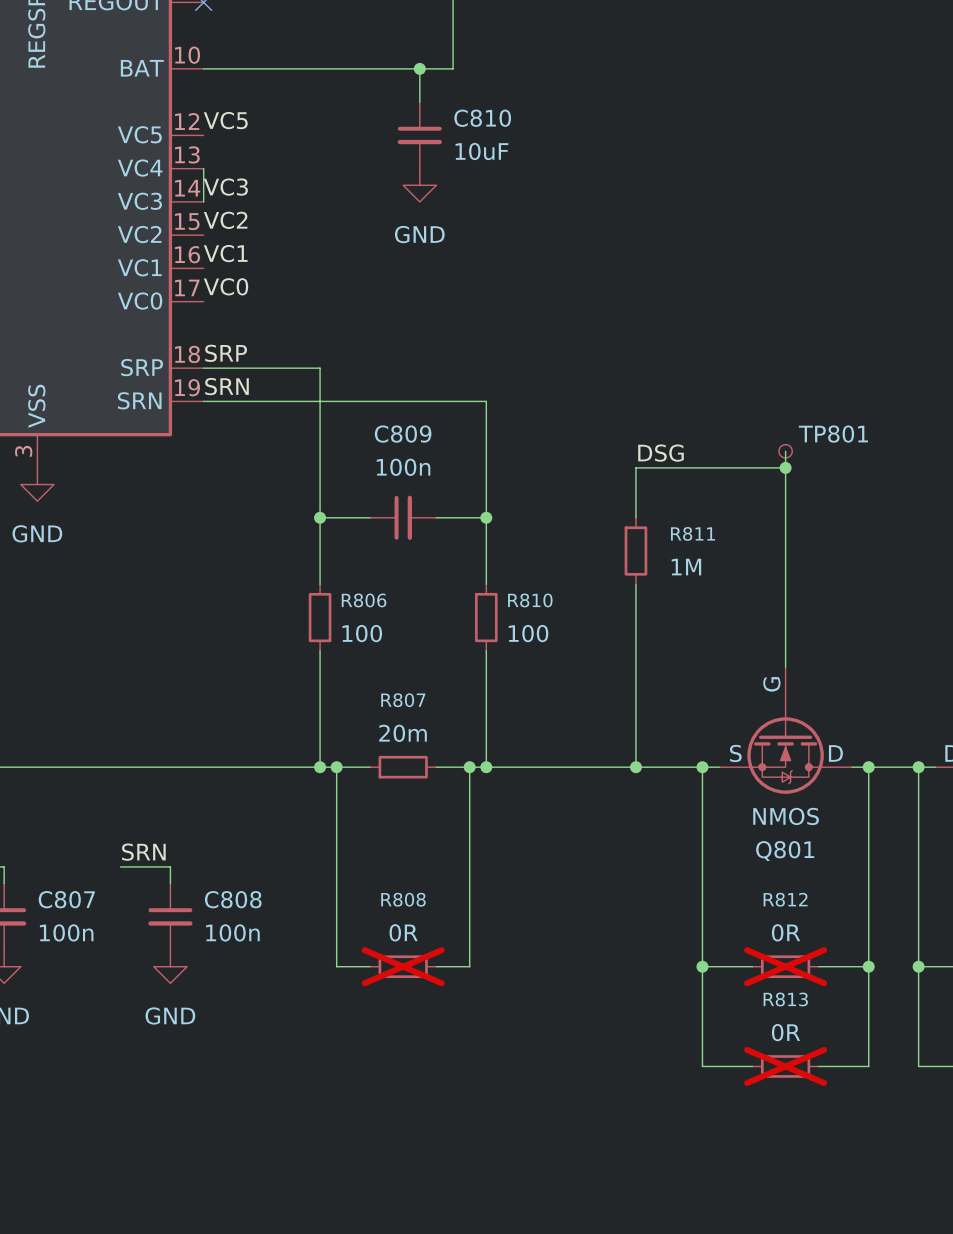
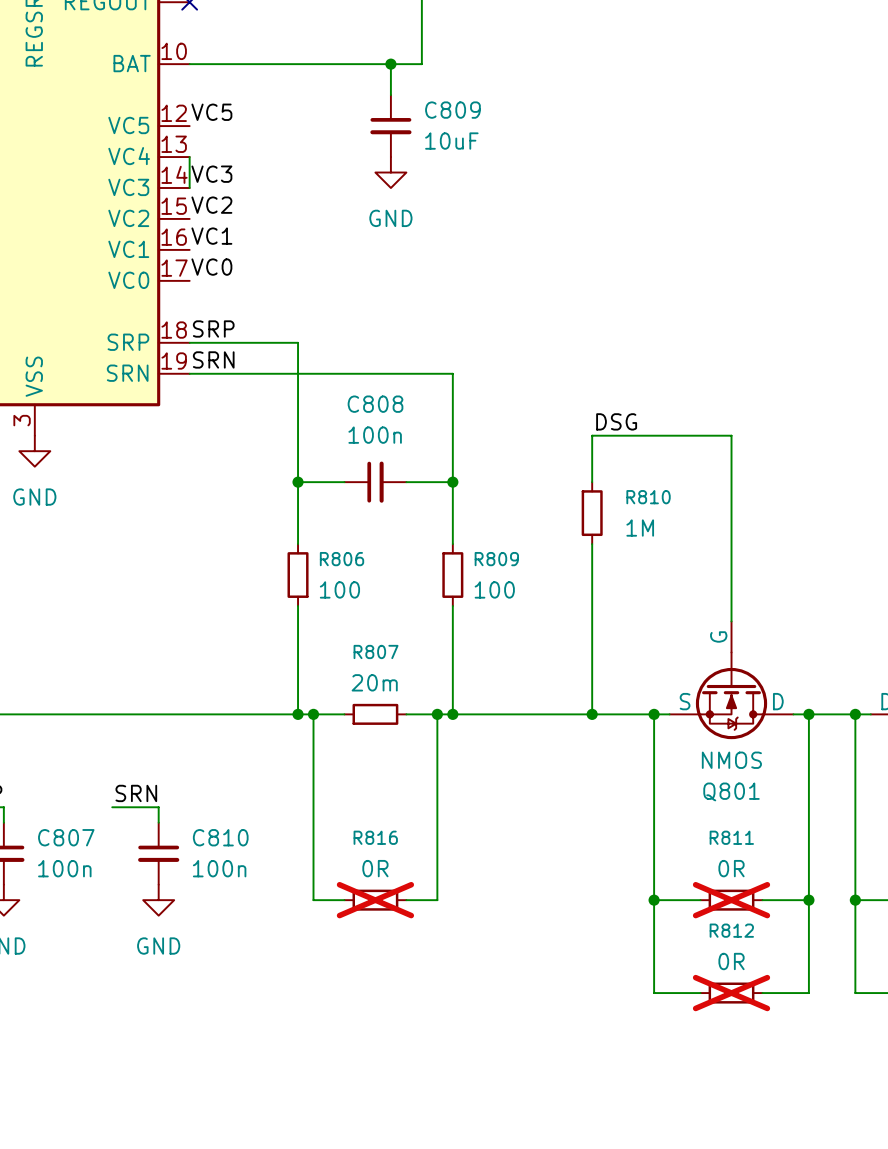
C810 name: C810 (482, 118) -> C809 (452, 110)
C809 name: C809 (403, 434) -> C808 (375, 404)
wire: (785, 451) (785, 467) -> none
TP801: (785, 451) -> none
junction: (785, 467) -> none
R811 name: R811 (693, 533) -> R810 (648, 497)
R810 name: R810 (530, 600) -> R809 (496, 559)
C808 name: C808 (233, 899) -> C810 (220, 837)
R808 name: R808 (403, 899) -> R816 (375, 837)
R812 name: R812 (785, 899) -> R811 (731, 837)
R813 name: R813 (785, 999) -> R812 (731, 930)

